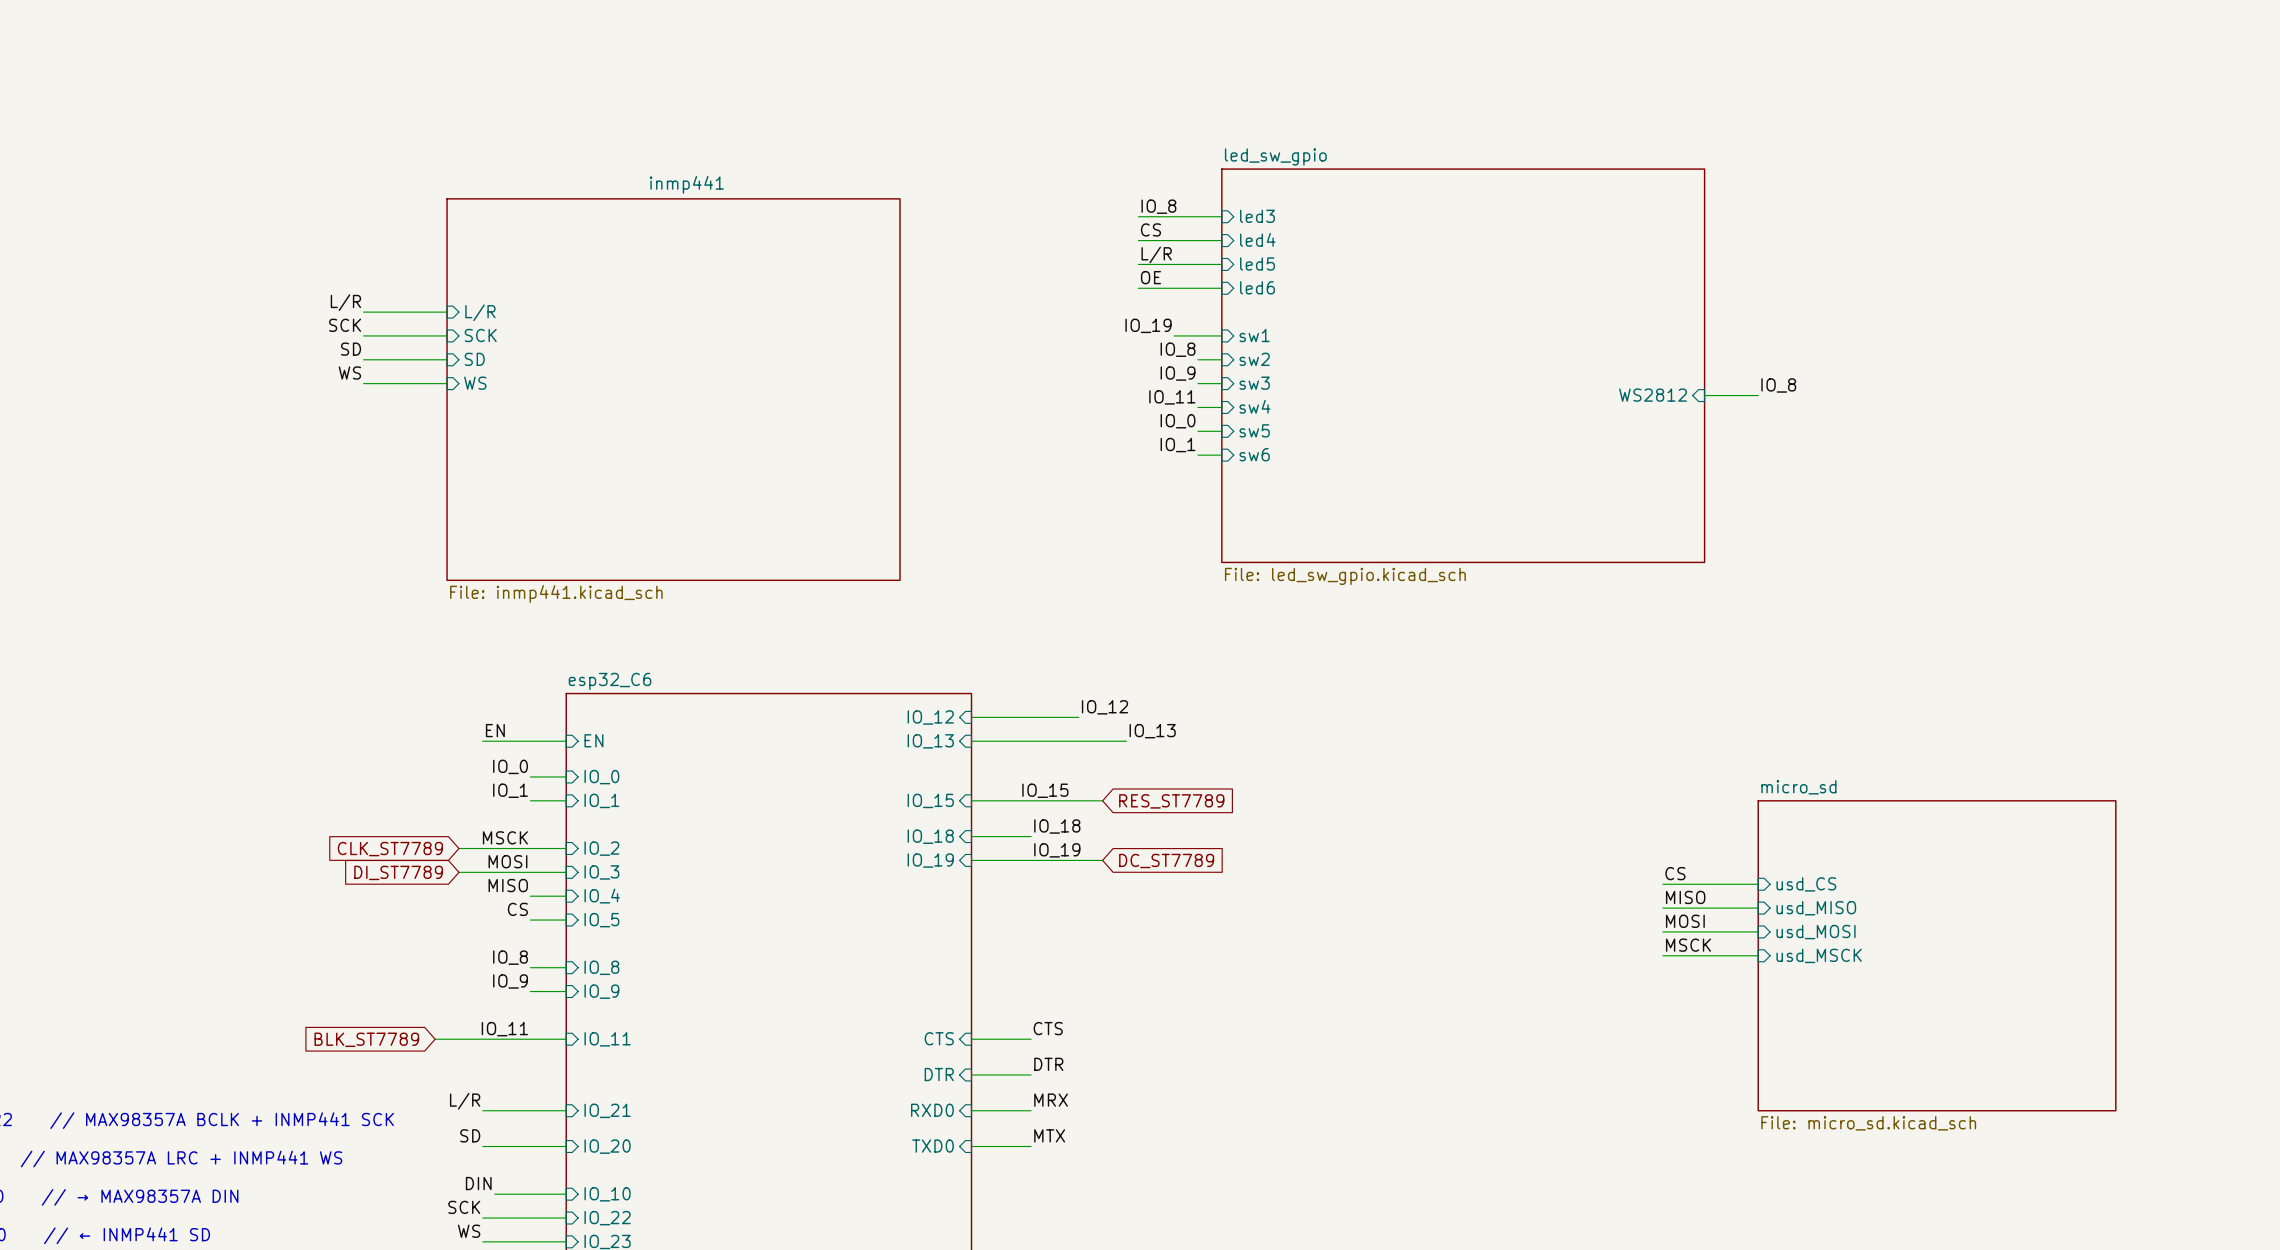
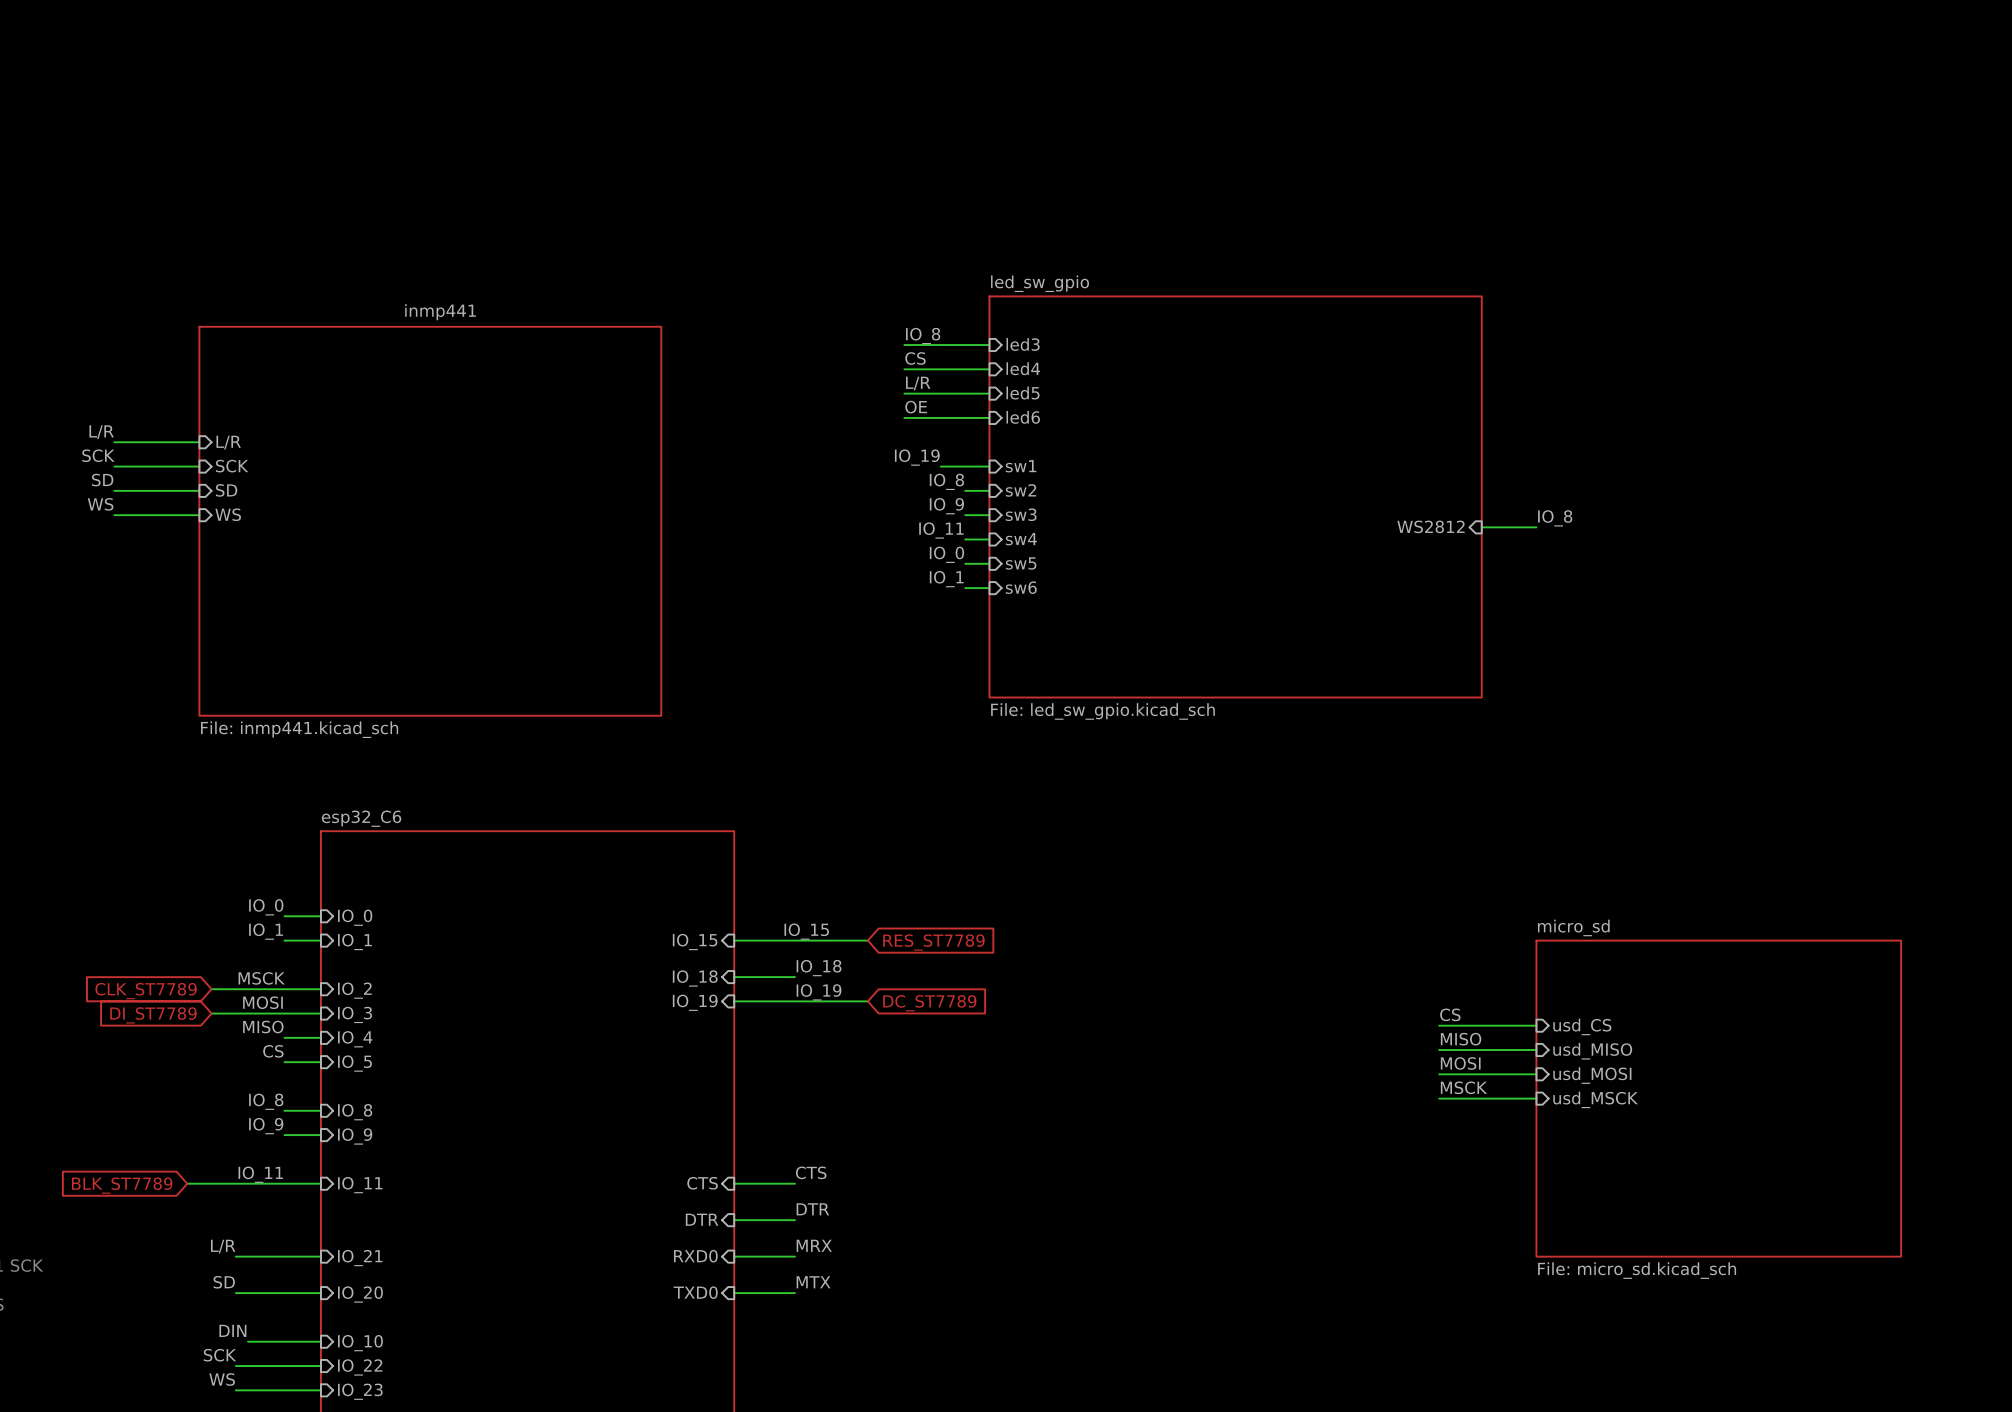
label: IO_12 (1104, 707) -> none
sheet pin: IO_12 (930, 717) -> none
wire: (971, 717) (1078, 717) -> none
label: EN (495, 730) -> none
label: IO_13 (1152, 731) -> none
sheet pin: EN (593, 740) -> none
wire: (482, 741) (566, 741) -> none
sheet pin: IO_13 (930, 741) -> none
wire: (971, 741) (1126, 741) -> none

